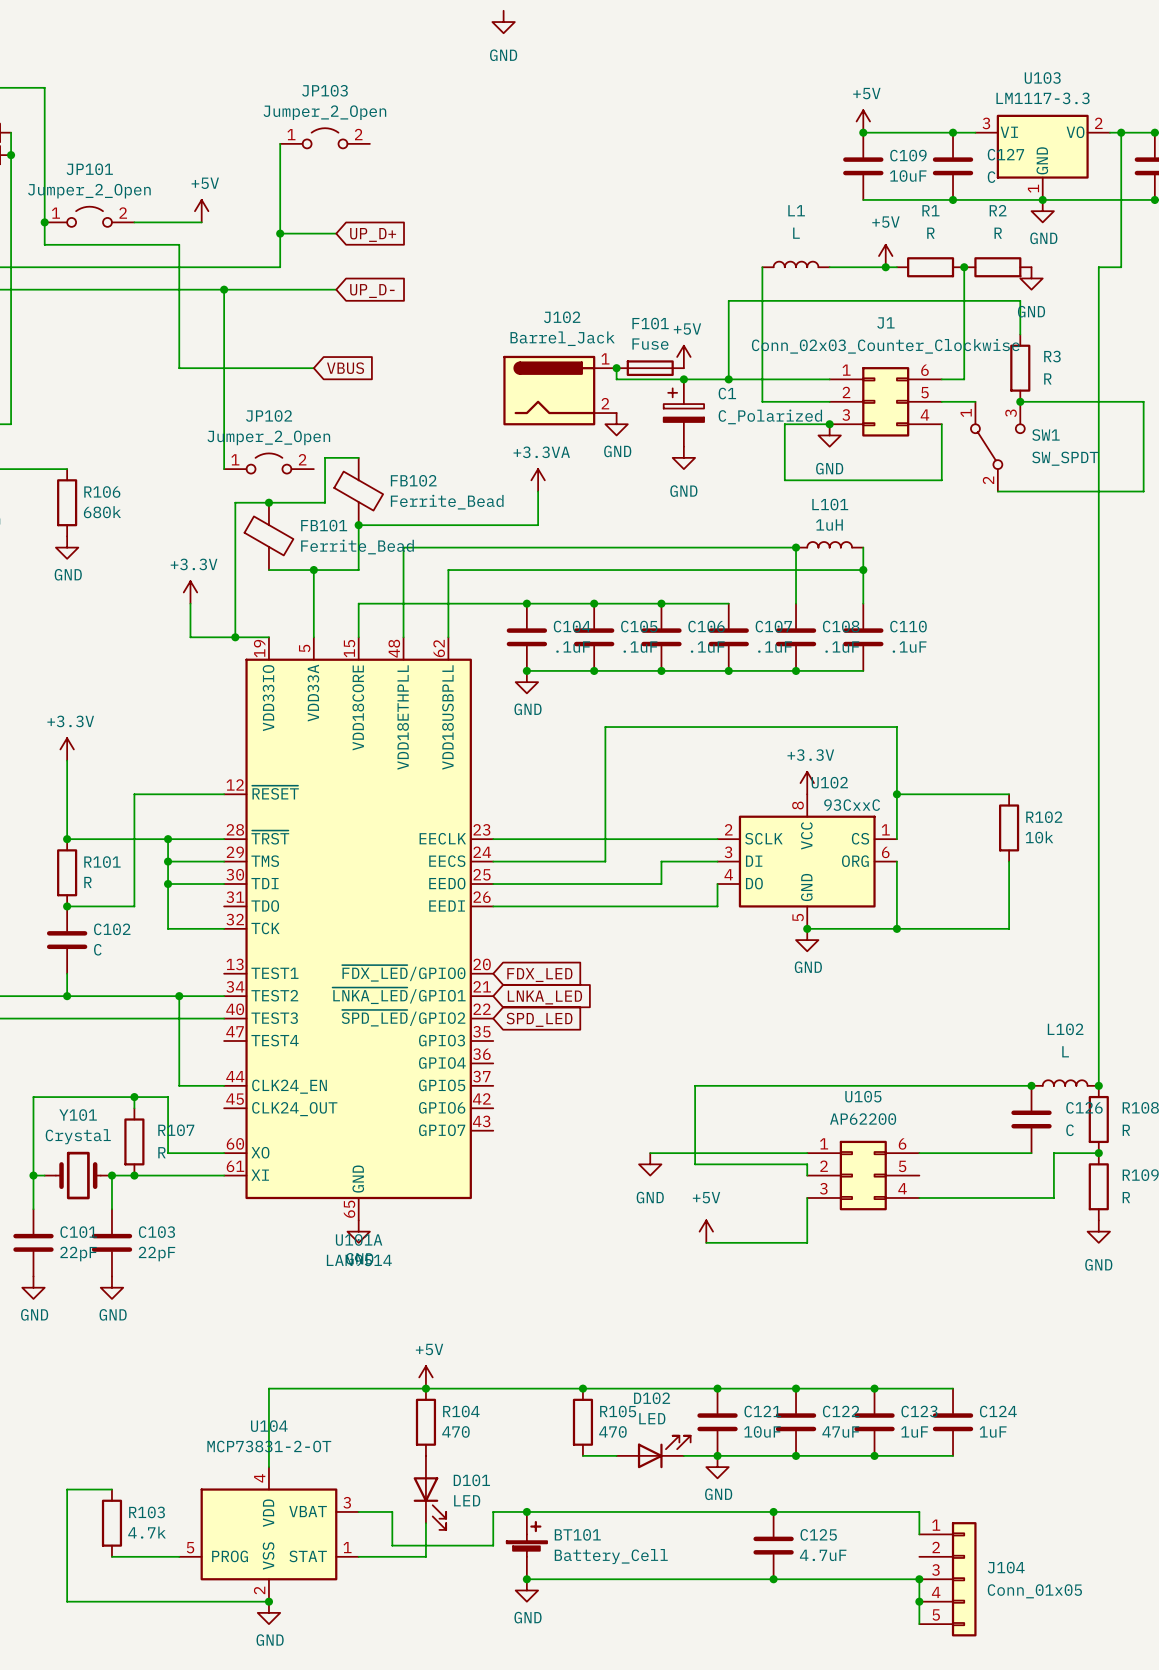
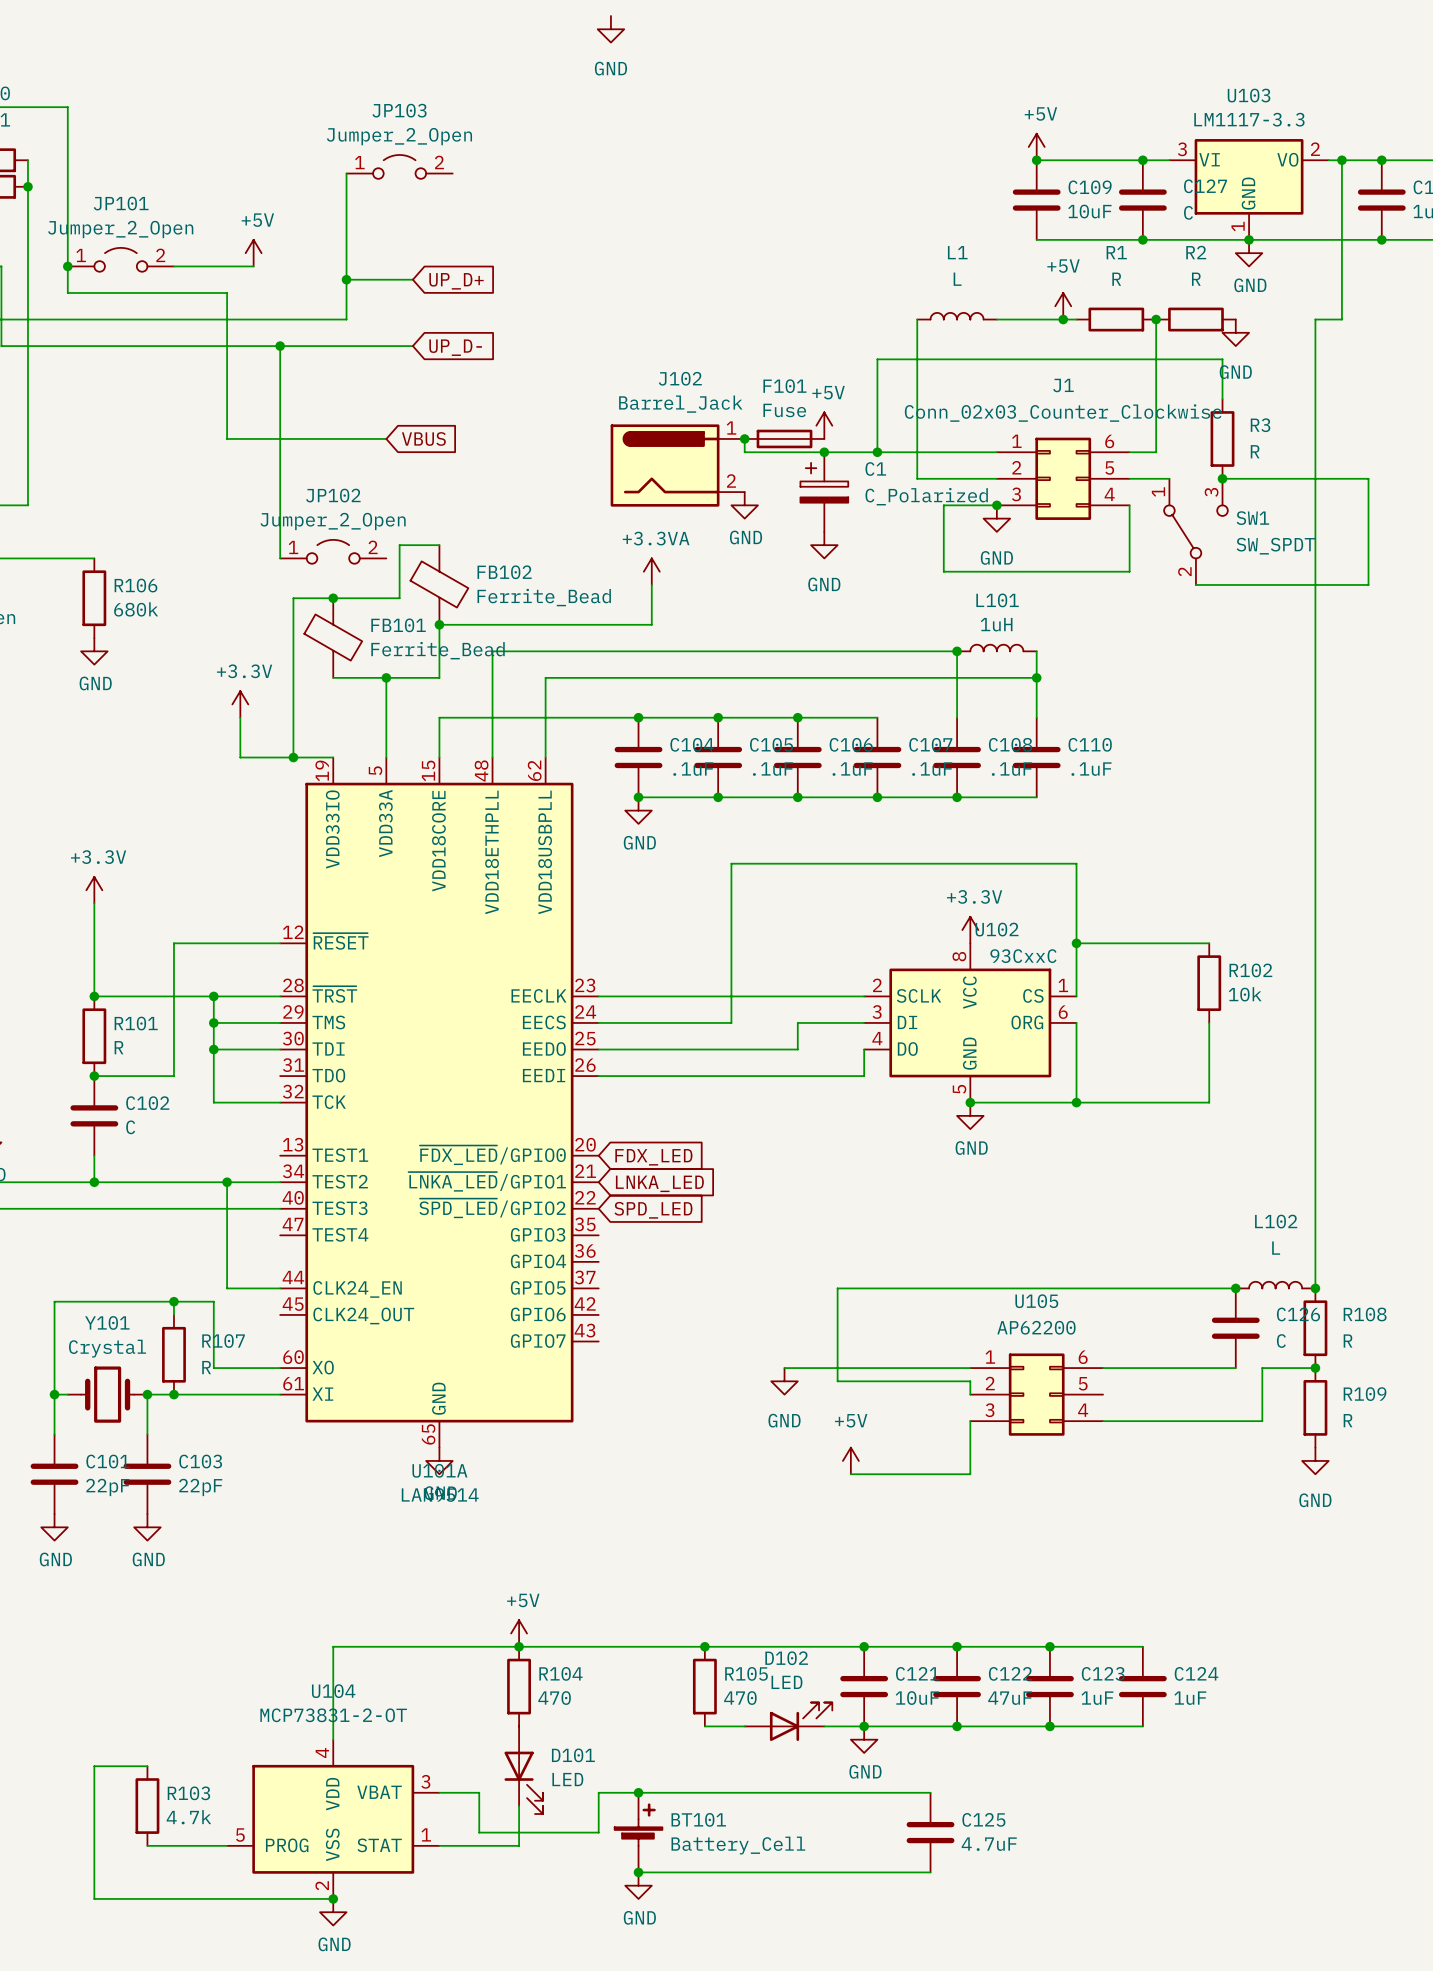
wire: (773, 1511) (919, 1511) (919, 1534) -> none
junction: (773, 1511) -> none
wire: (773, 1579) (919, 1579) (919, 1624) -> none
junction: (773, 1579) -> none
junction: (919, 1579) -> none
J104: Conn_01x05 (947, 1579) -> none
junction: (919, 1601) -> none

